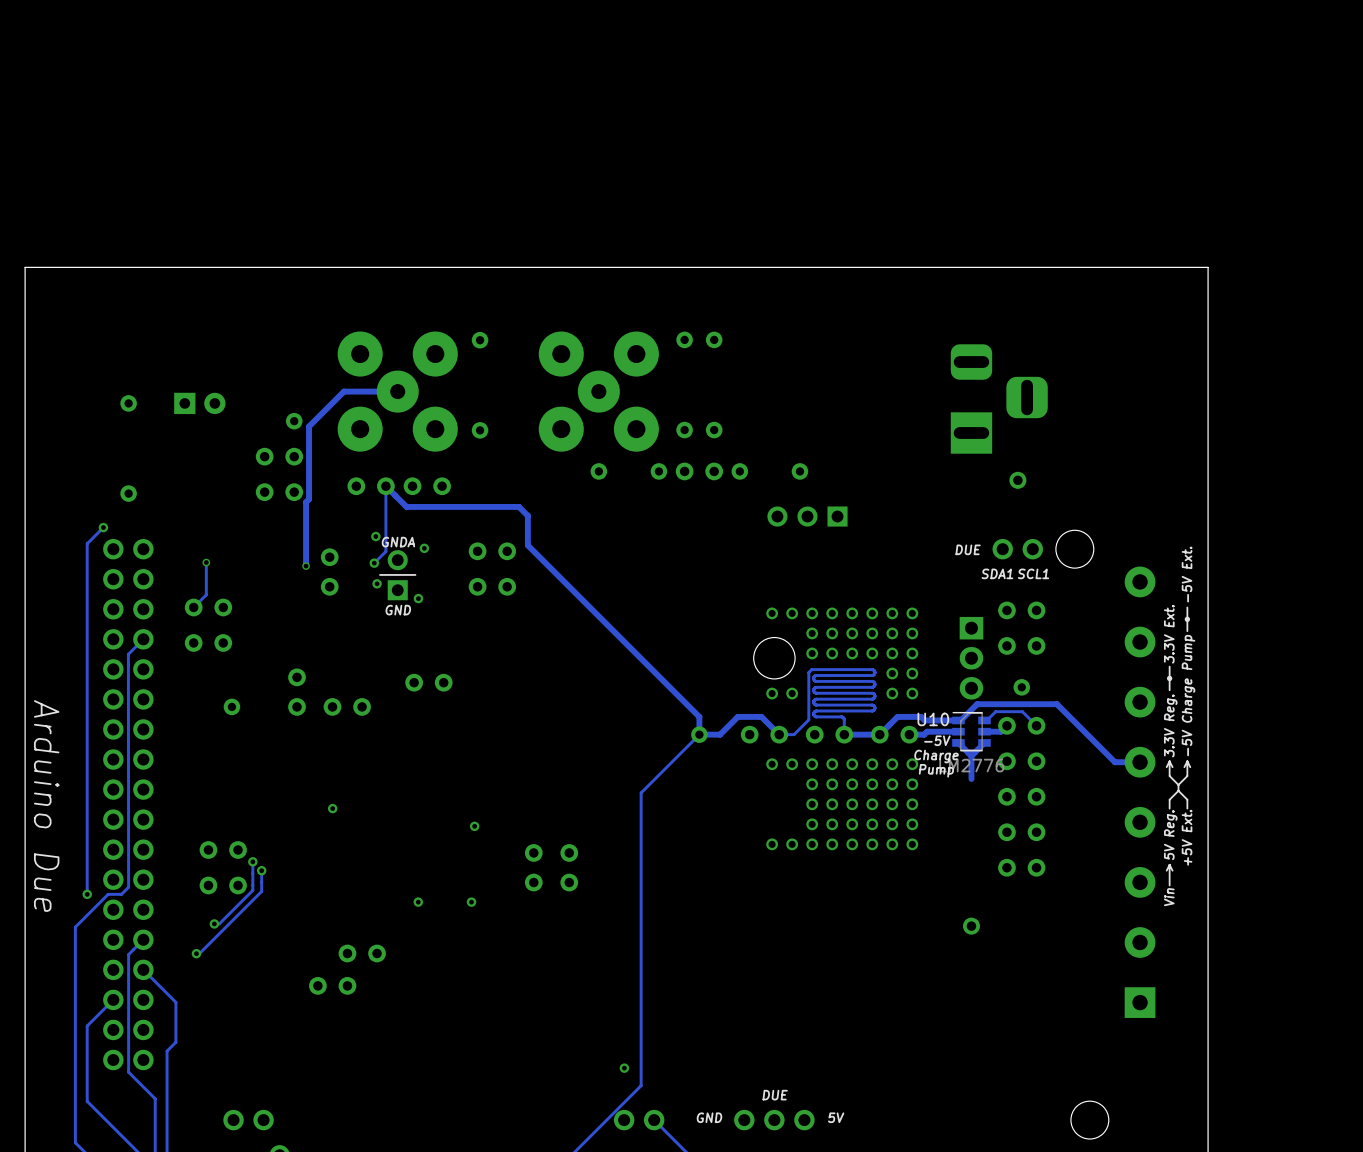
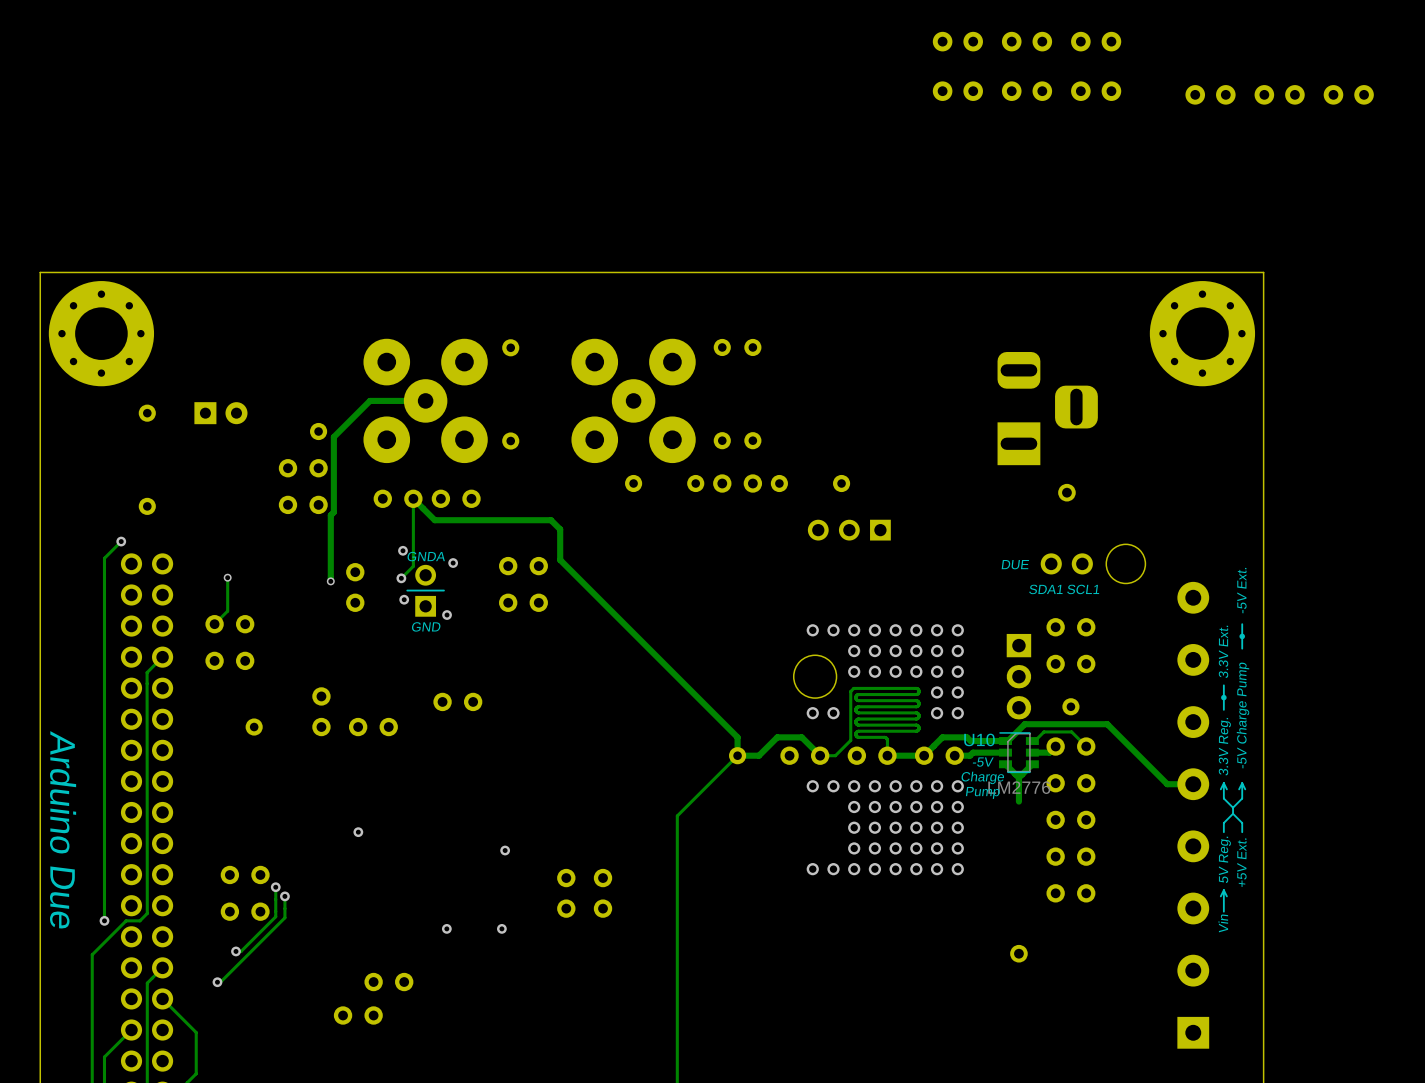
part: none -> (957, 41)
part: none -> (1027, 41)
part: none -> (1096, 41)
part: none -> (957, 91)
part: none -> (1027, 91)
part: none -> (1096, 91)
part: none -> (1210, 94)
part: none -> (1279, 94)
part: none -> (1348, 94)
part: none -> (101, 333)
part: none -> (1202, 333)

